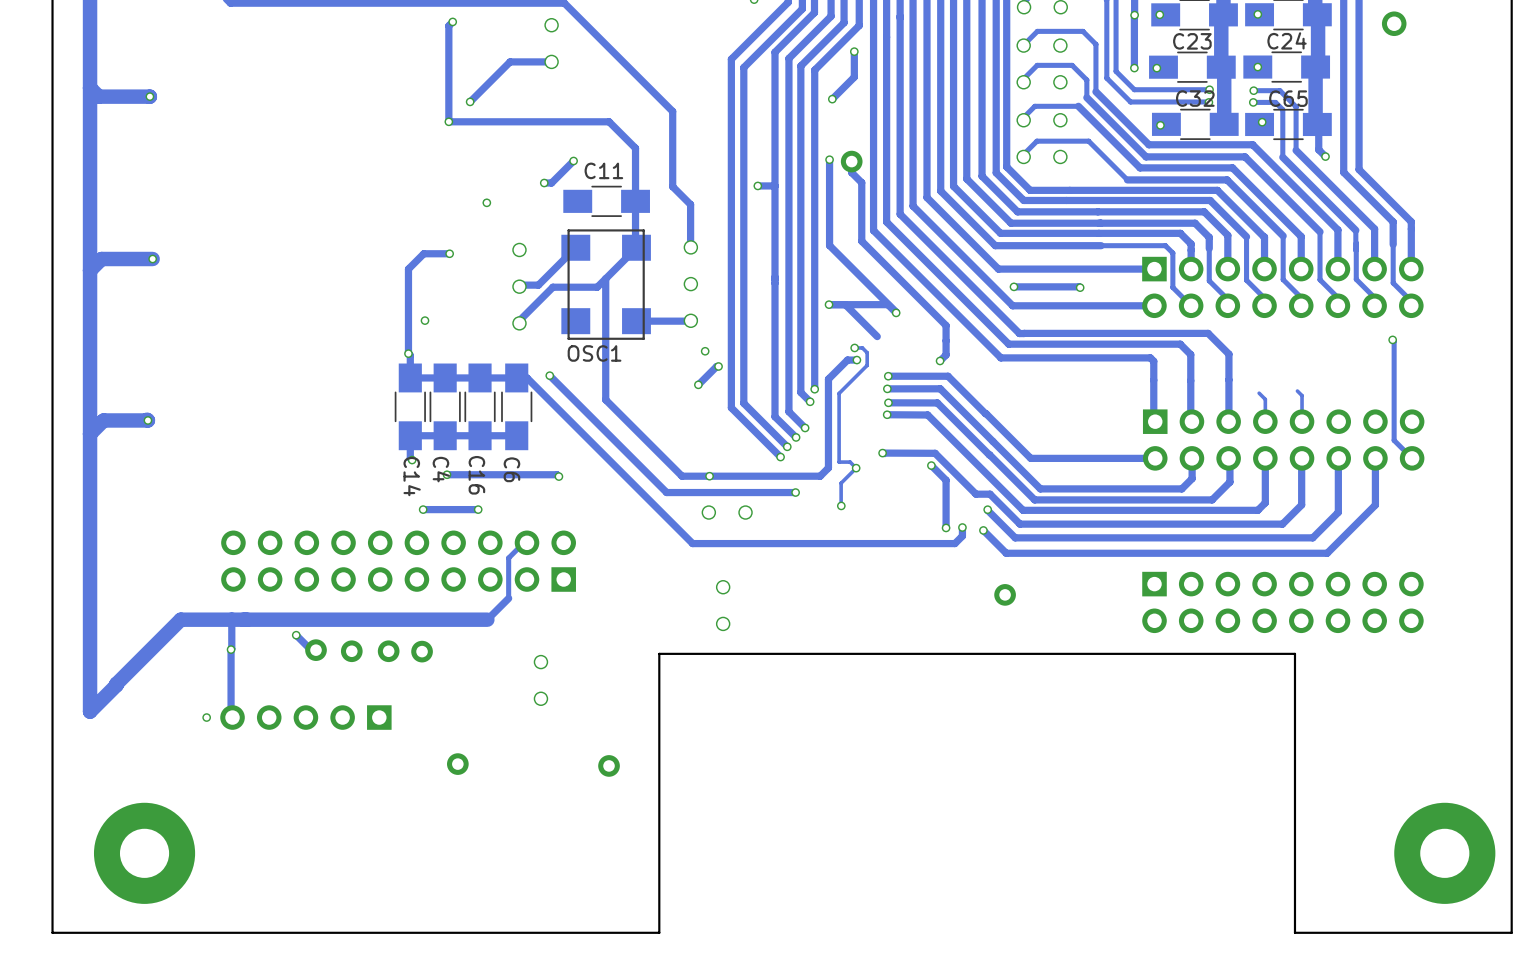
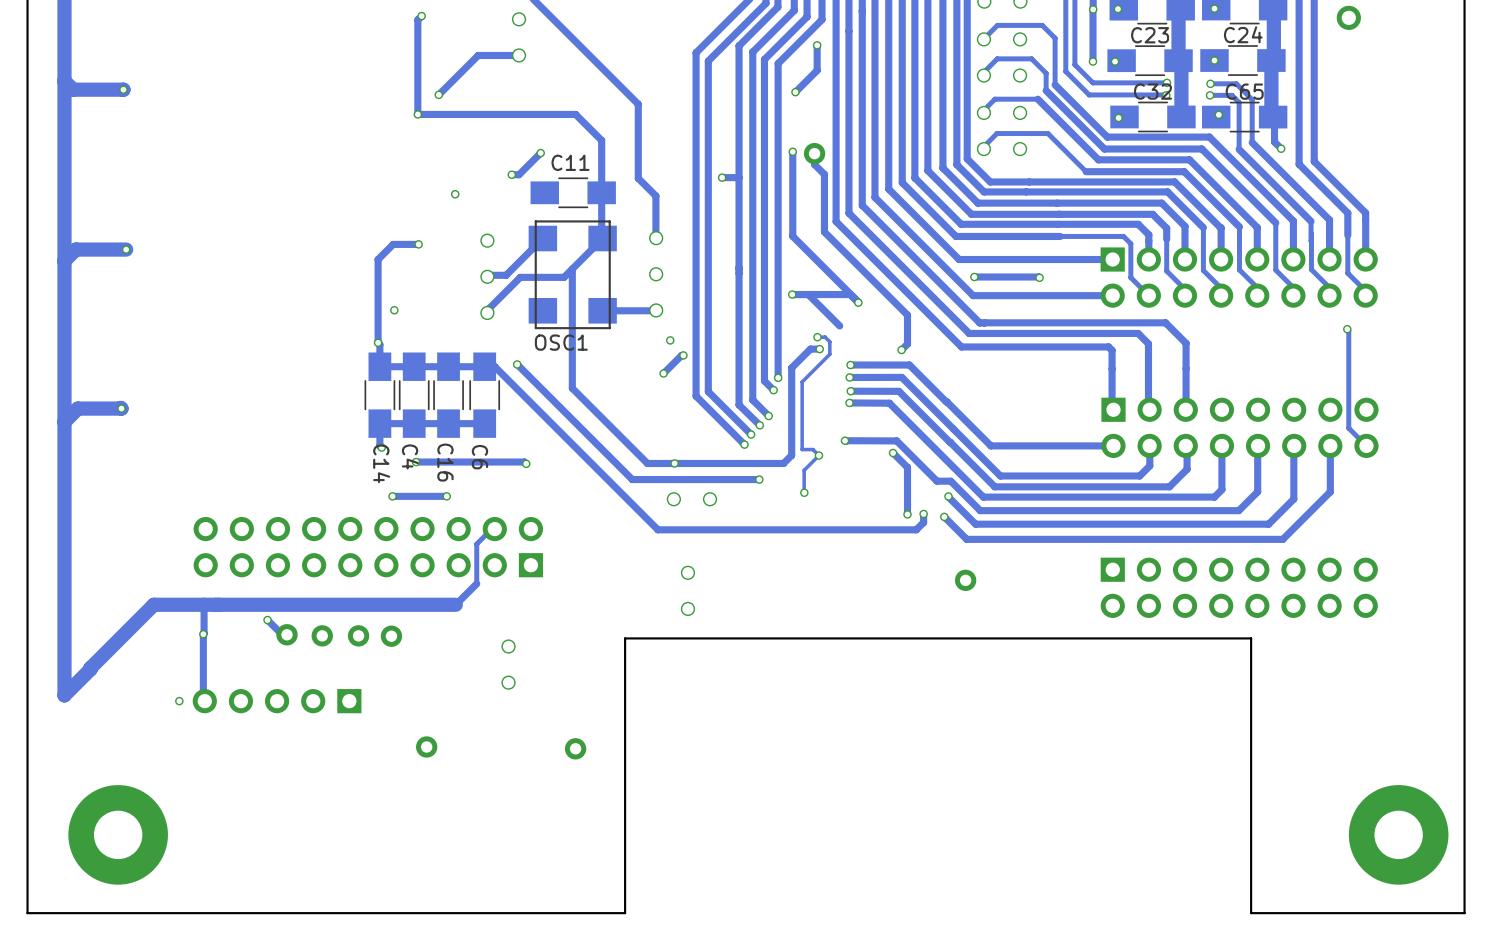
track: (1297, 391) (1302, 395) (1302, 421) -> none
track: (1259, 393) (1265, 399) (1265, 421) -> none

